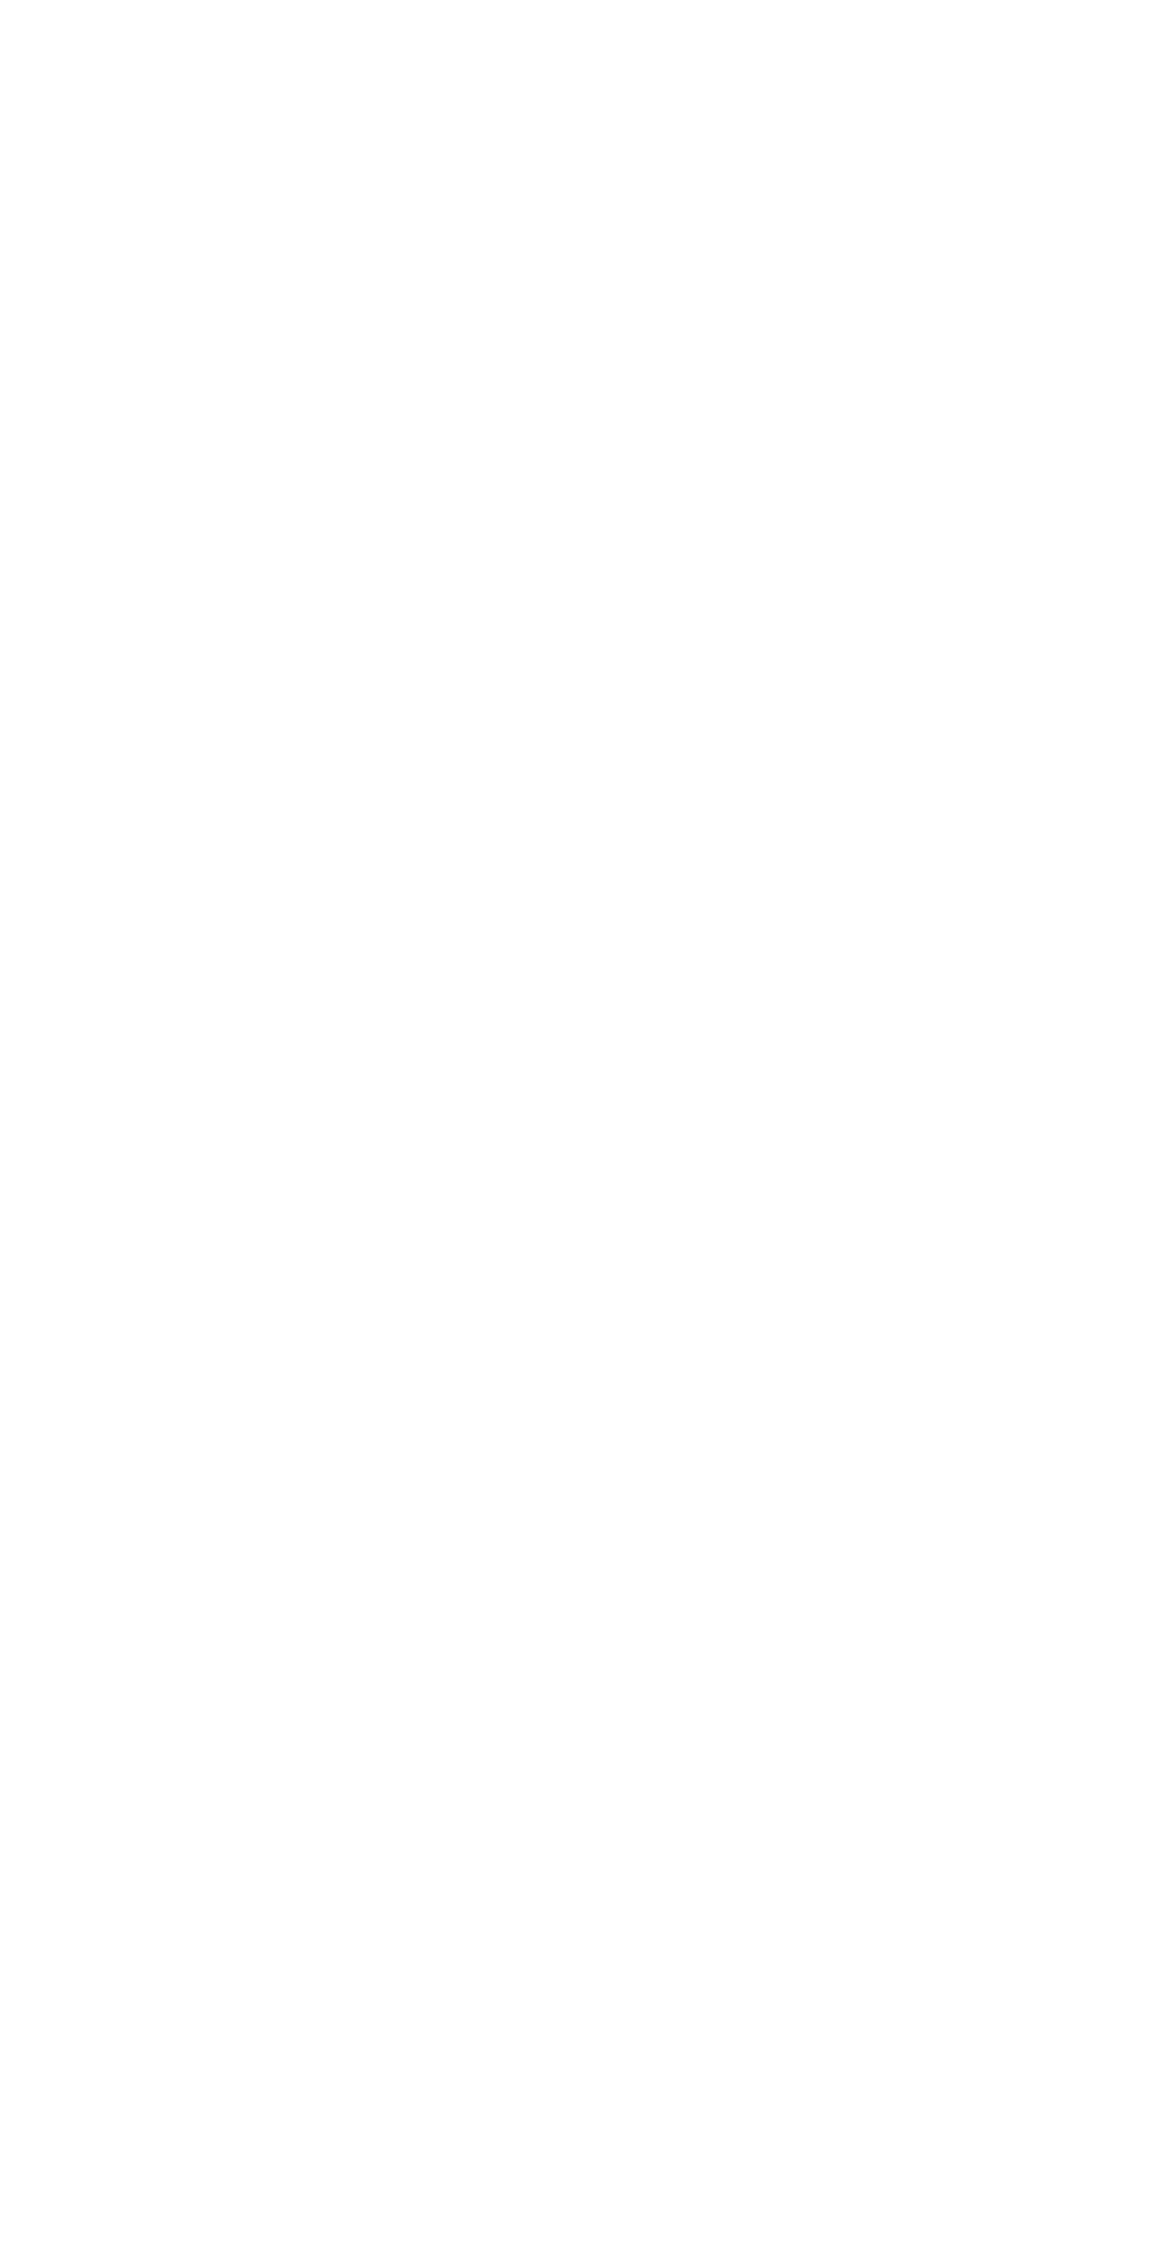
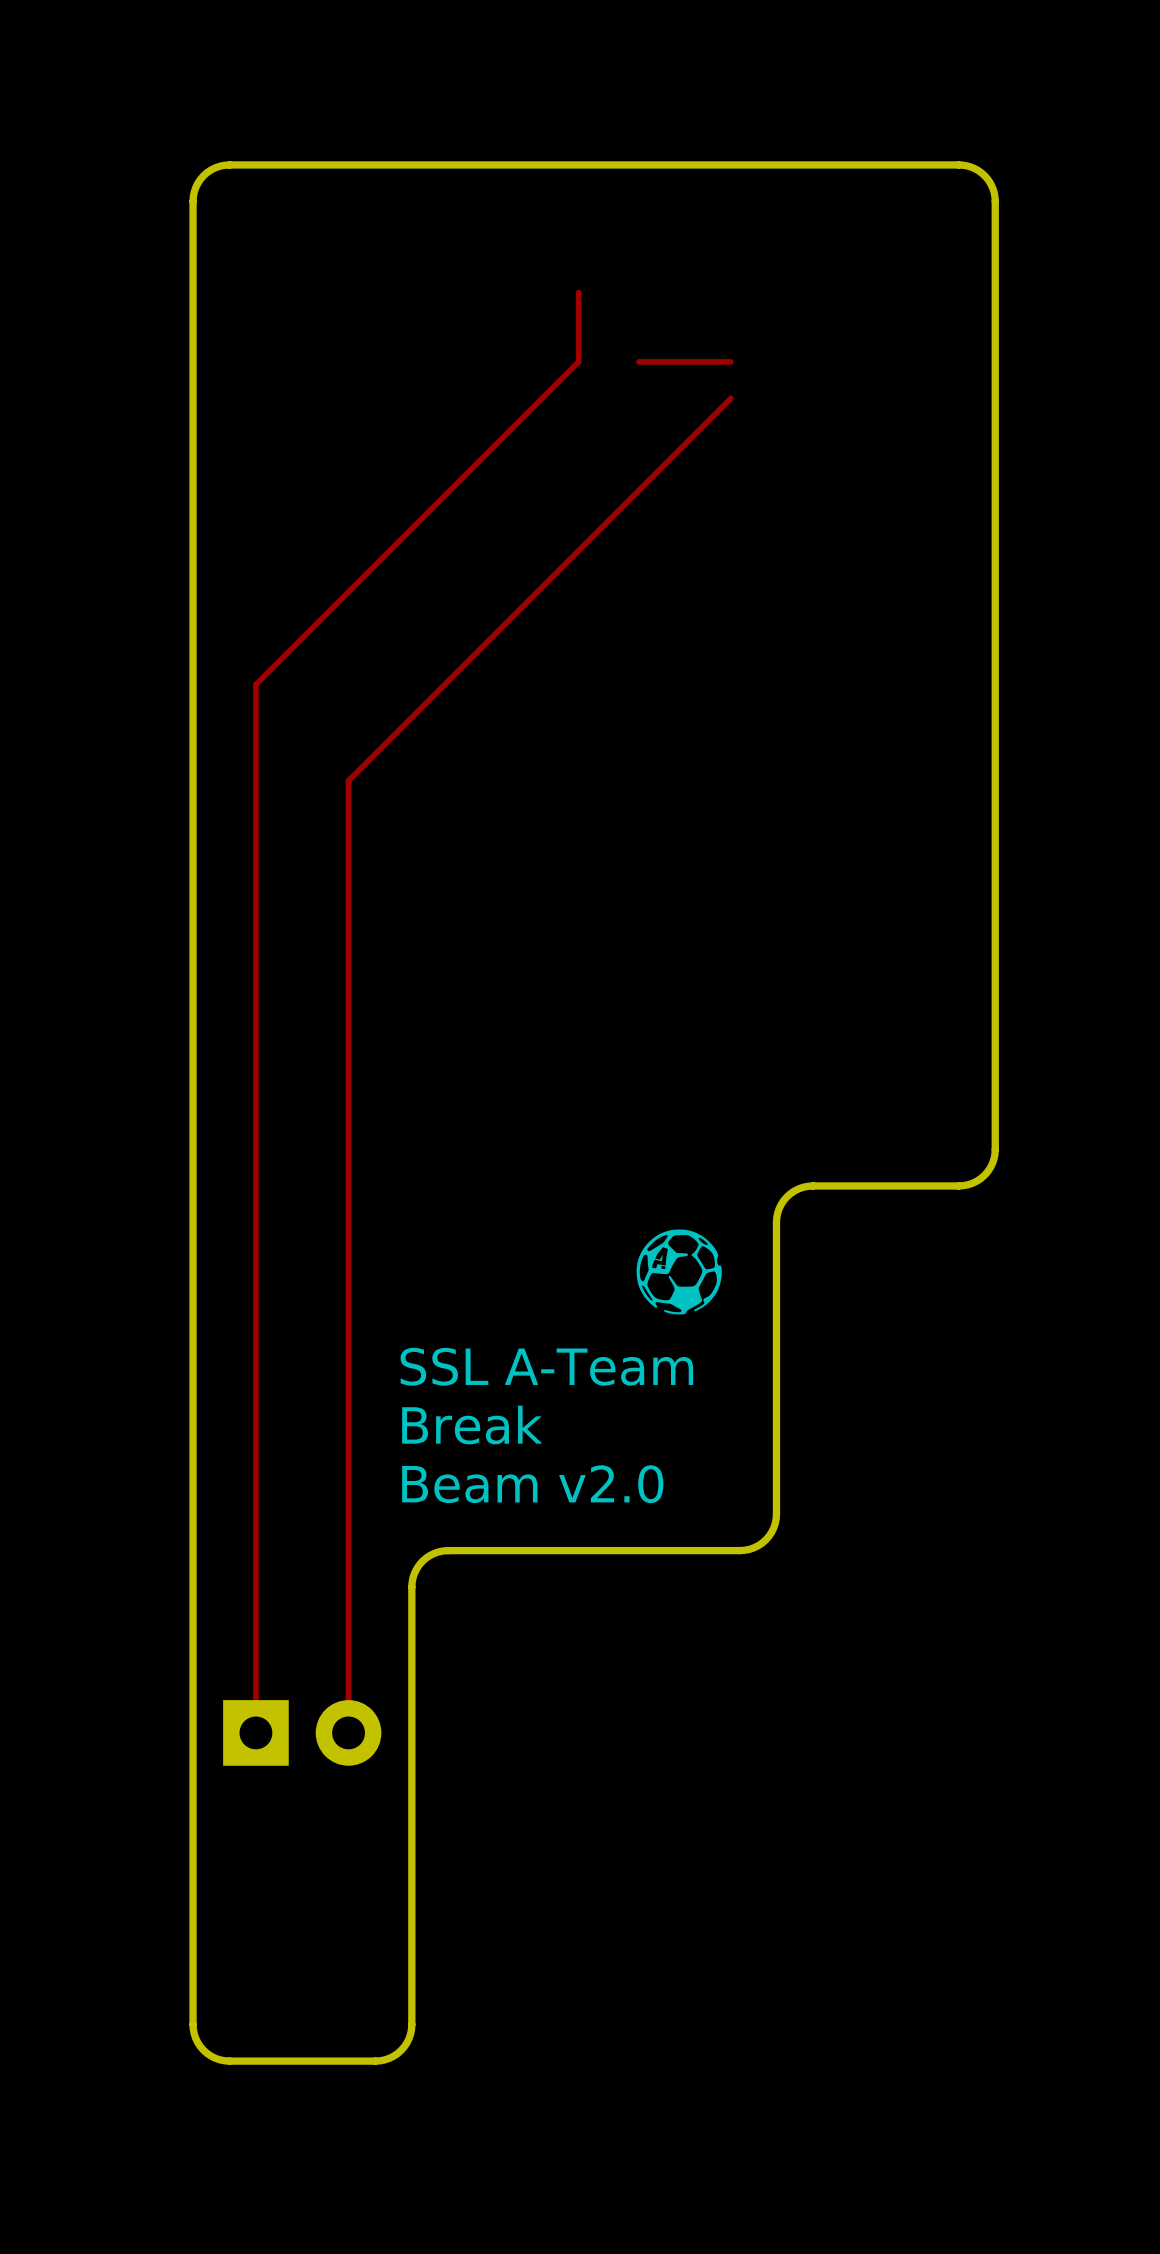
board edge: none -> (229, 164) (958, 164) (974, 168) (984, 175) (991, 185) (995, 197) (994, 1158) (984, 1175) (968, 1184) (808, 1186) (794, 1190) (781, 1204) (776, 1222) (776, 1514) (771, 1532) (762, 1543) (749, 1549) (740, 1550) (448, 1550) (430, 1555) (419, 1564) (413, 1577) (411, 1587) (411, 2029) (406, 2042) (401, 2050) (389, 2058) (380, 2060) (224, 2060) (215, 2058) (203, 2050) (197, 2042) (193, 2029) (193, 201) (195, 187) (203, 175) (215, 167) (229, 164)
track: none -> (578, 292) (578, 361) (255, 684) (255, 1732)
track: none -> (638, 361) (730, 361)
track: none -> (730, 398) (348, 780) (348, 1732)
drawing: none -> [636, 1229, 722, 1315]
text: none -> SSL A-Team (546, 1366)
text: none -> Break (472, 1425)
text: none -> Beam v2.0 (532, 1484)
part: none -> (302, 1732)

